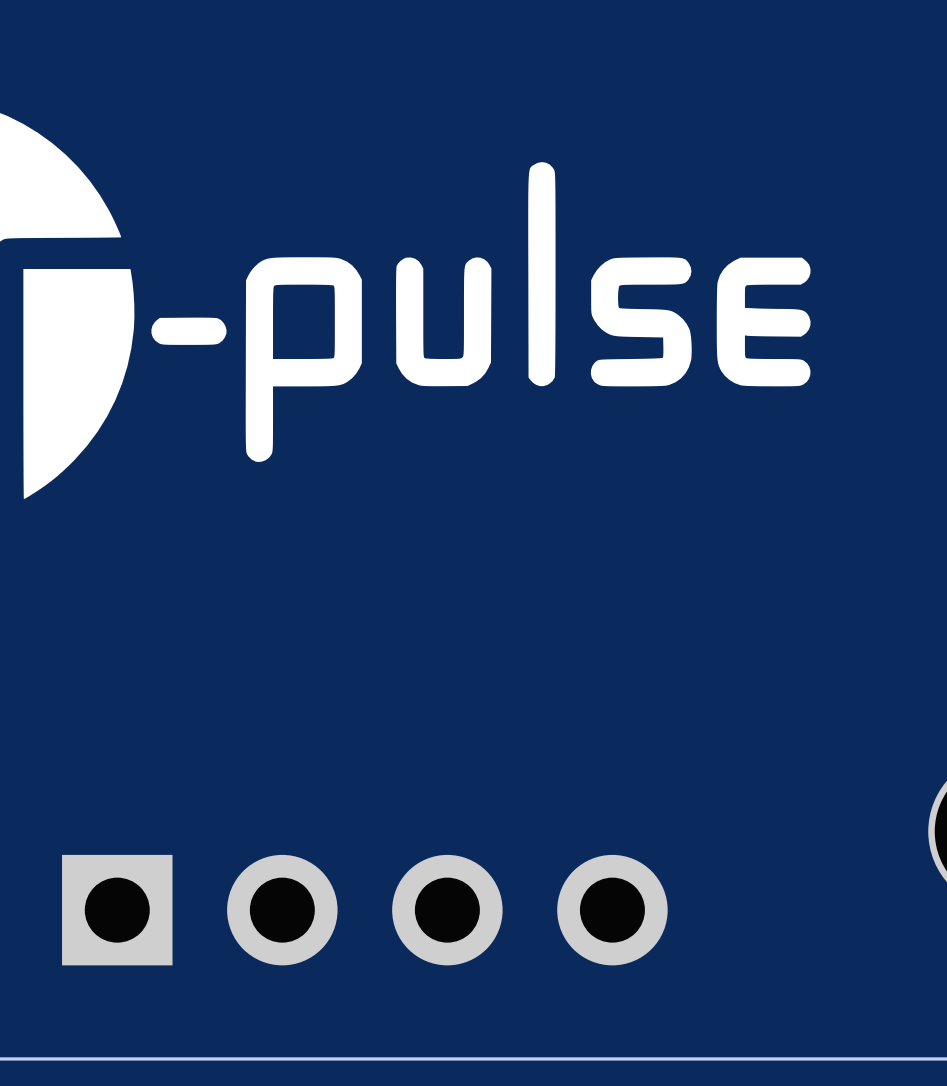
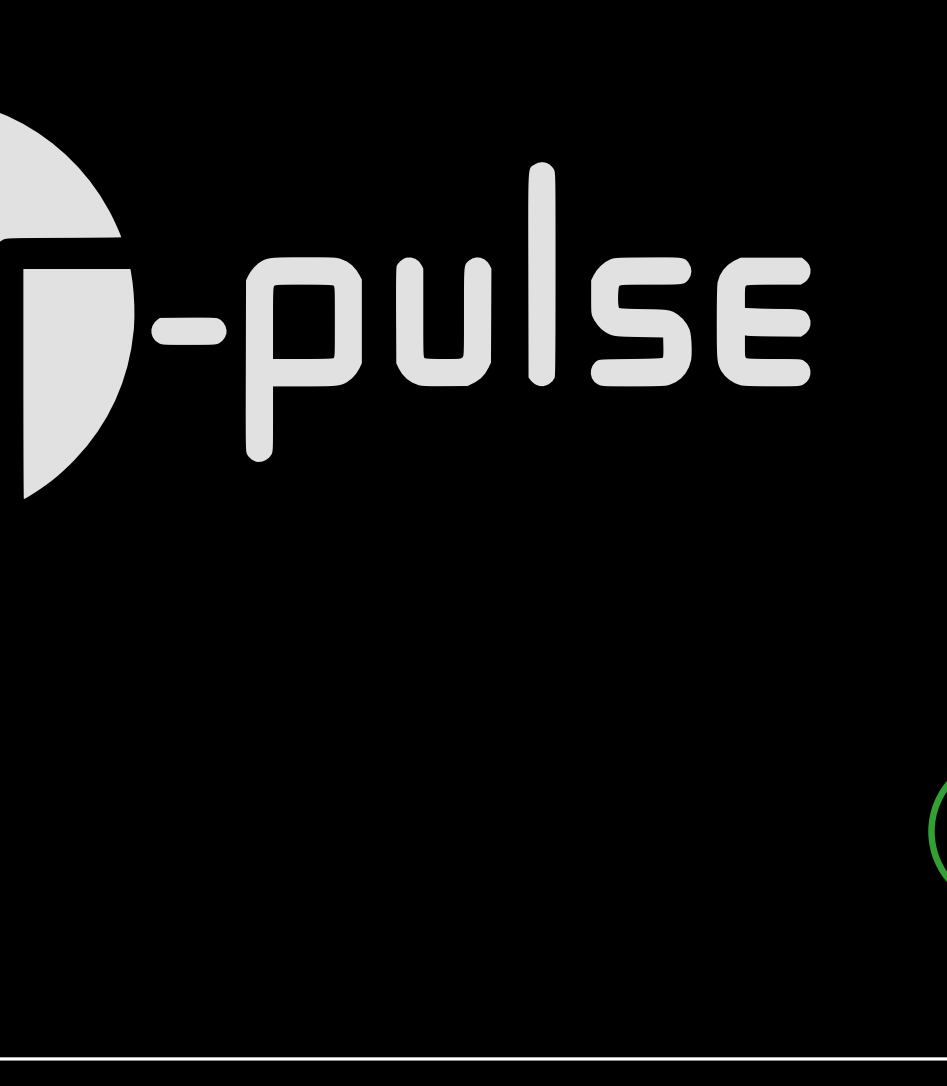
part: (364, 910) -> none

